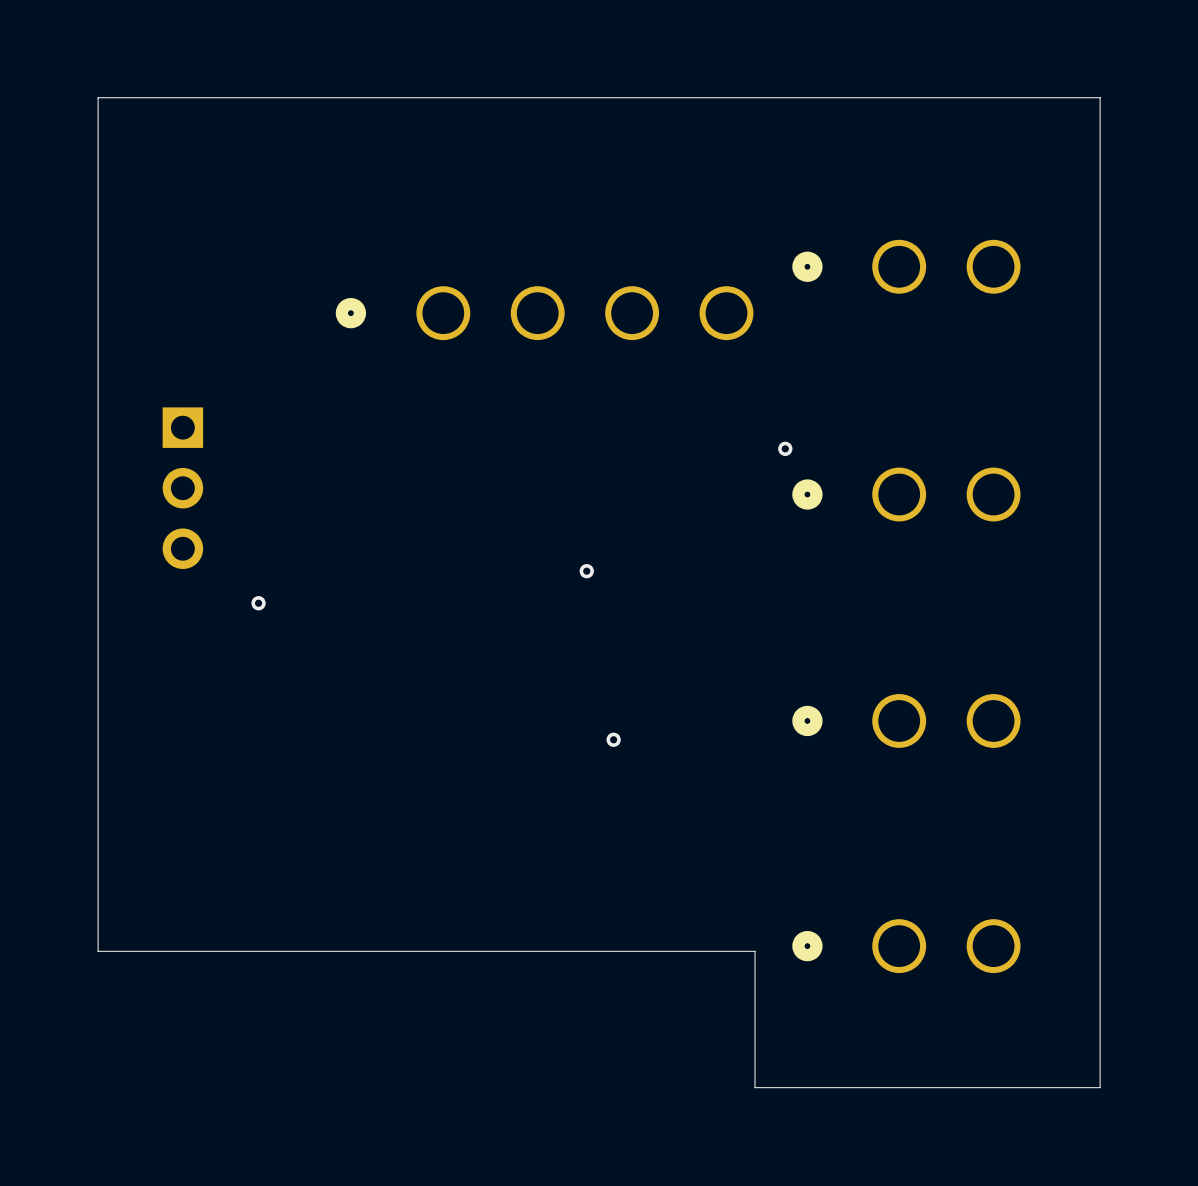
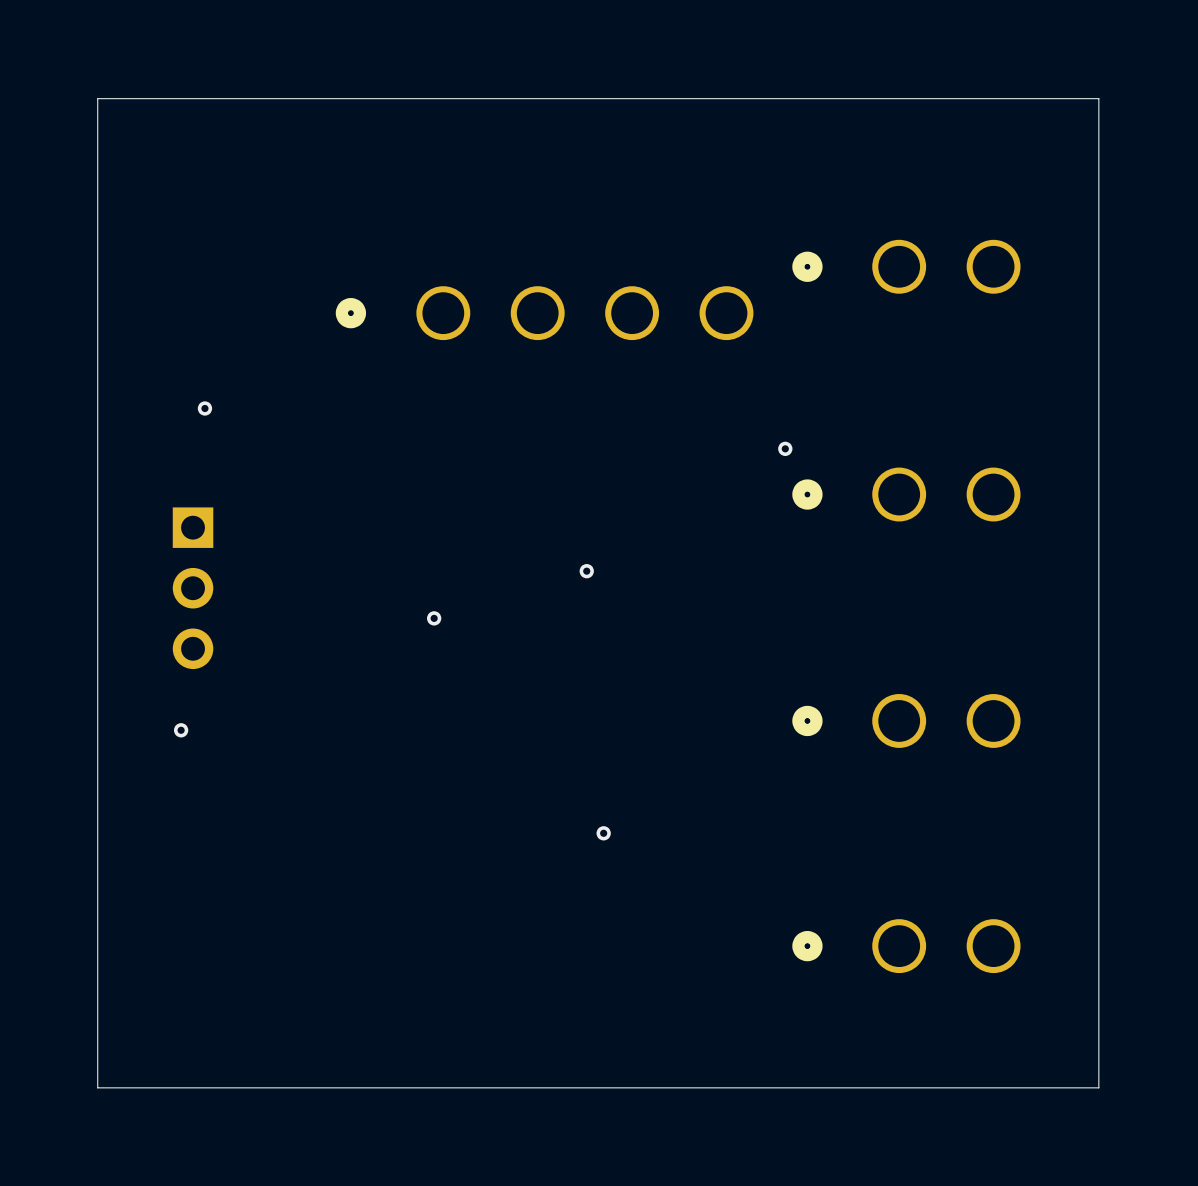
board edge: (1100, 97) (1100, 1087) (755, 1087) (755, 951) (98, 951) (98, 97) (1100, 97) -> (1098, 98) (1098, 1087) (97, 1087) (97, 98) (1098, 98)
via: none -> (204, 408)
part position: (182, 488) -> (193, 588)
via: (258, 603) -> none
via: none -> (434, 618)
via: none -> (181, 730)
via position: (613, 739) -> (603, 833)

